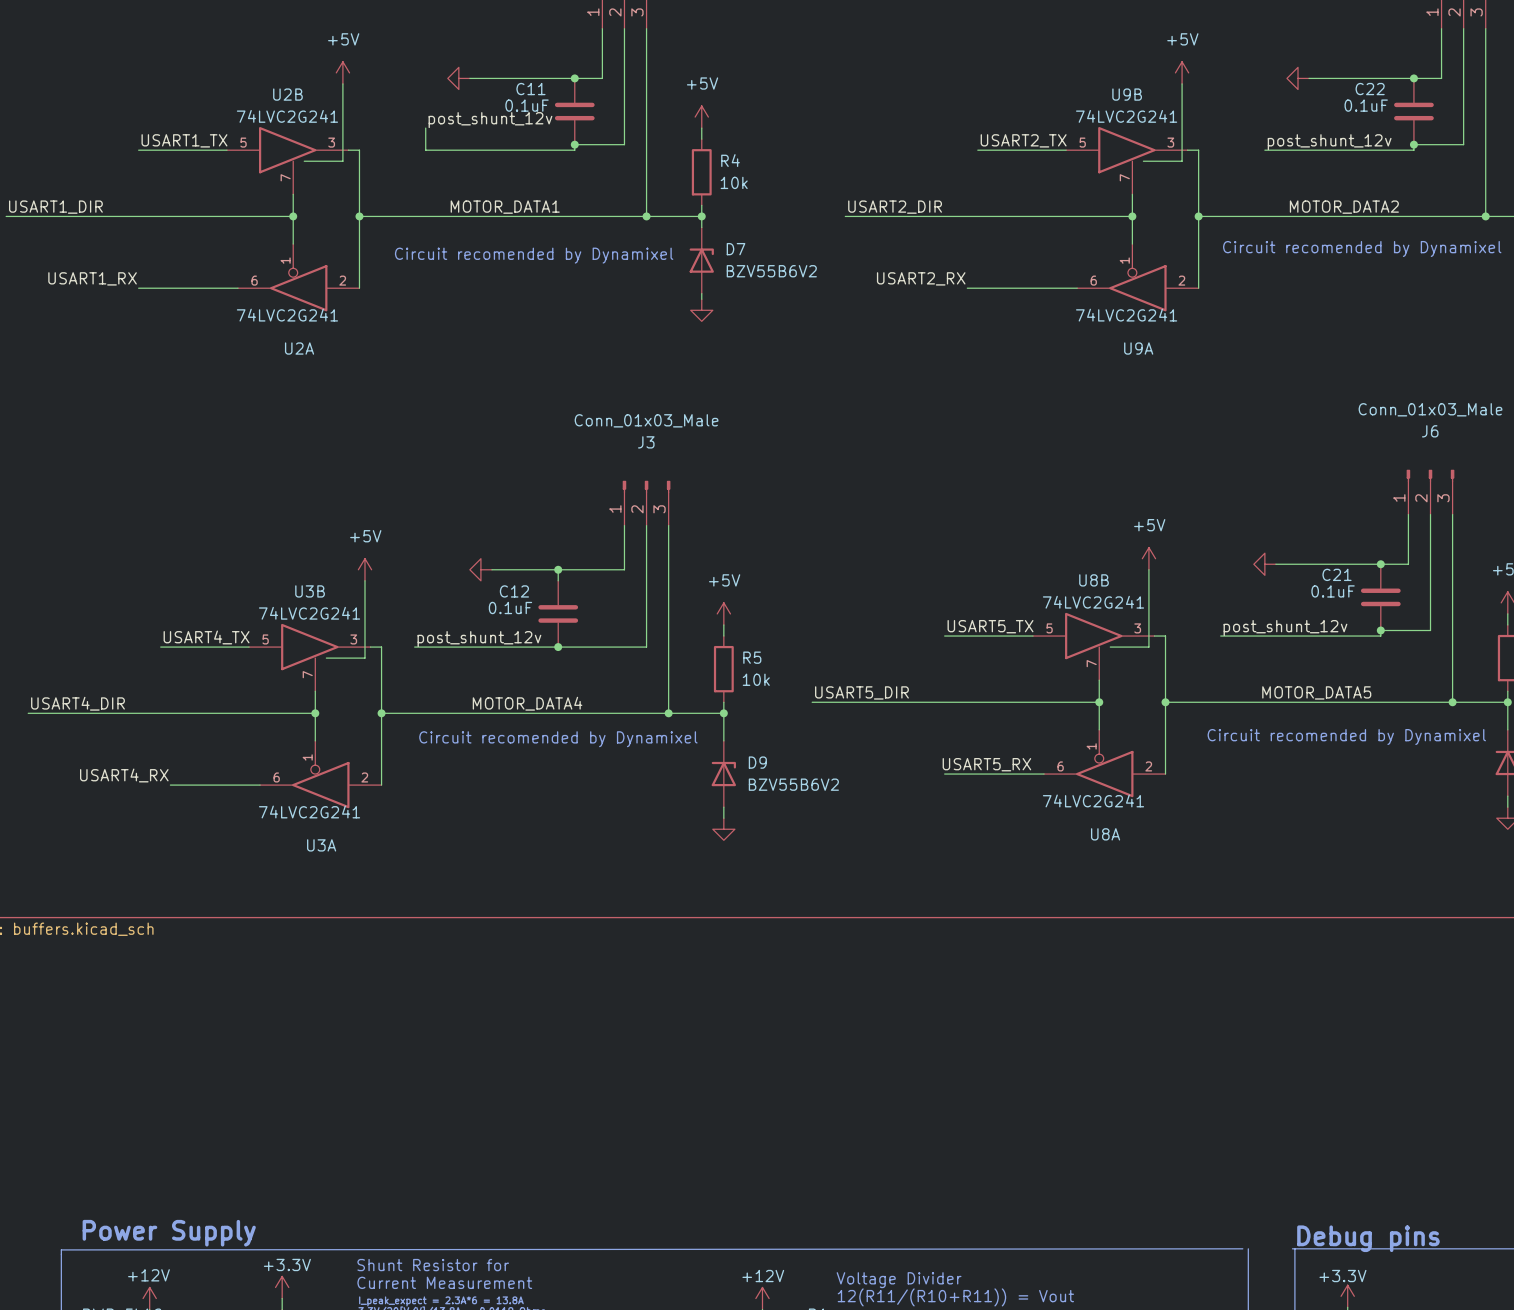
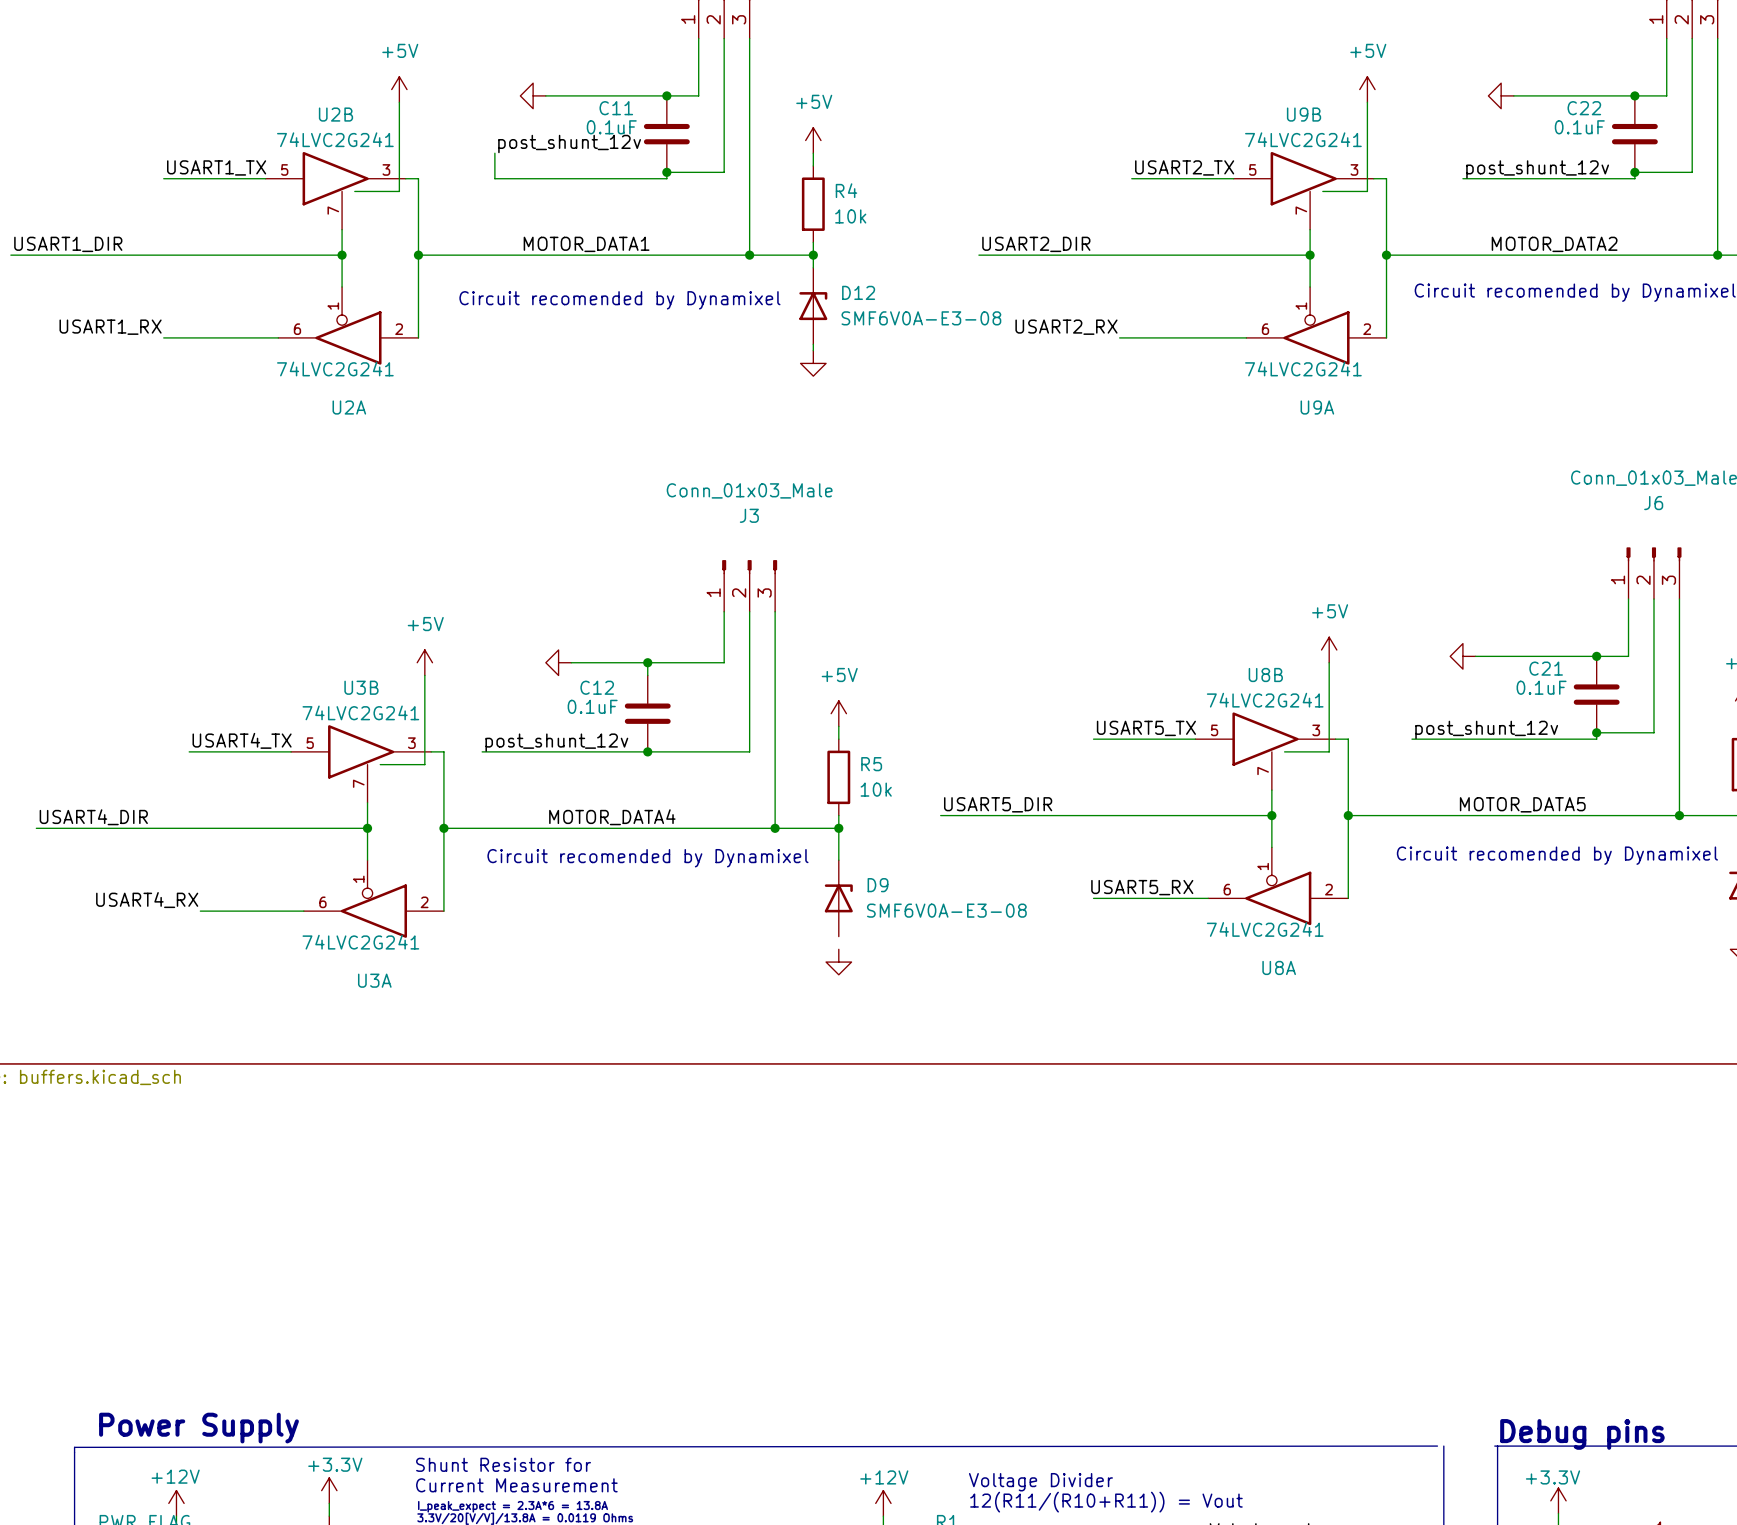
D7 name: D7 (736, 249) -> D12 (858, 292)
D7 value: BZV55B6V2 (771, 271) -> SMF6V0A-E3-08 (921, 318)
D9 value: BZV55B6V2 (793, 784) -> SMF6V0A-E3-08 (946, 910)
wire: (723, 807) (723, 818) -> none

